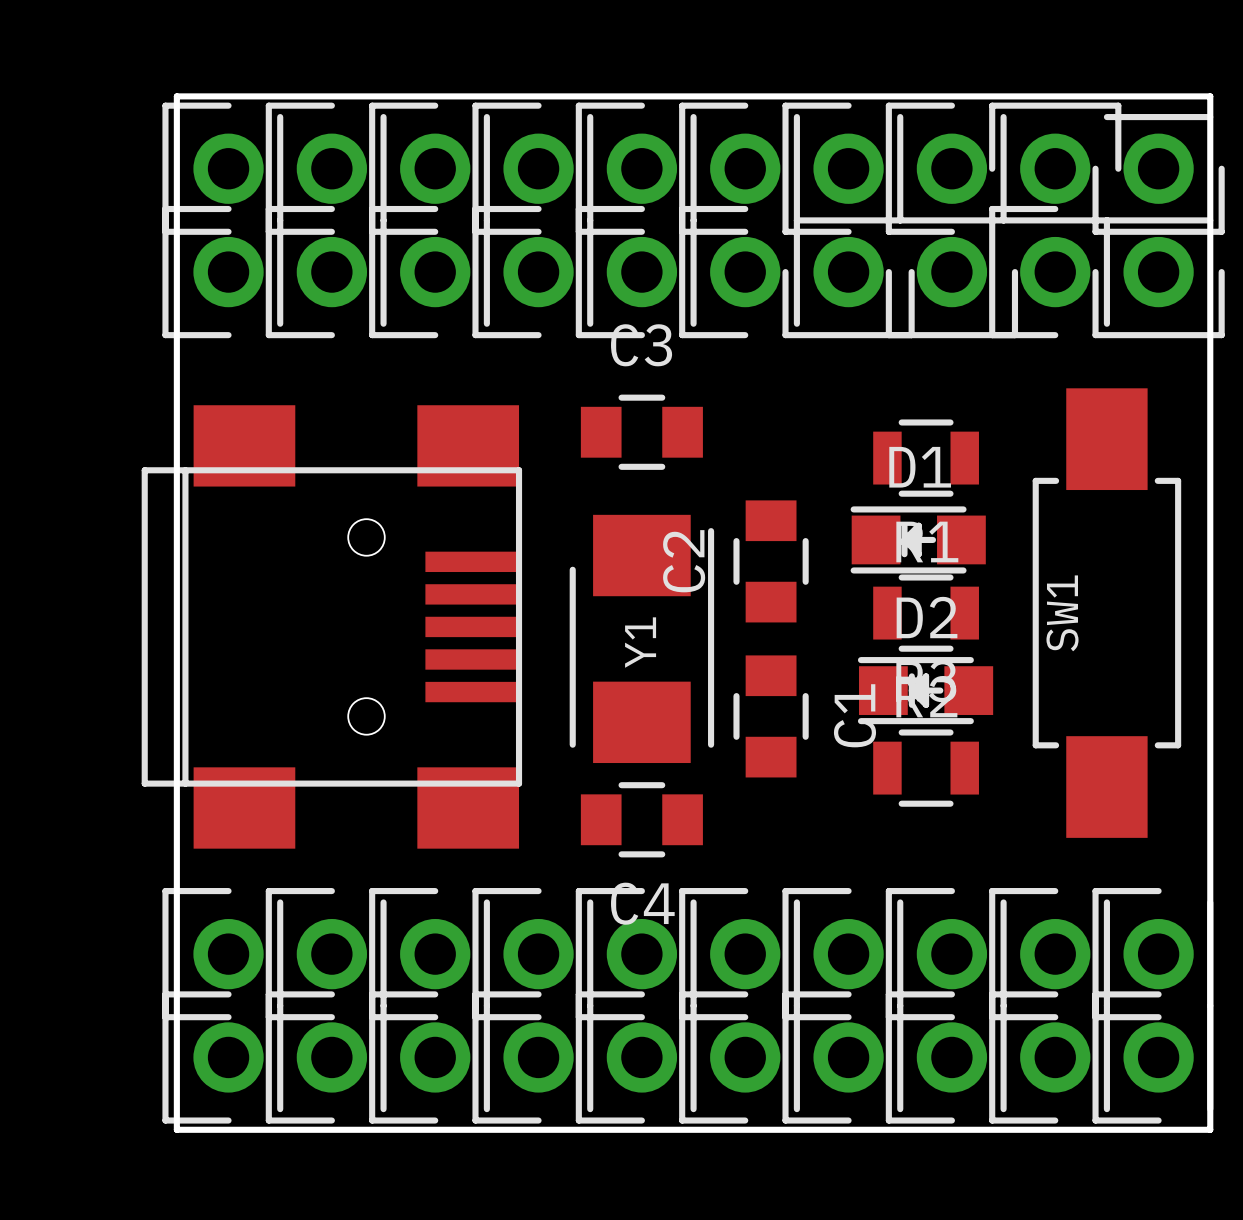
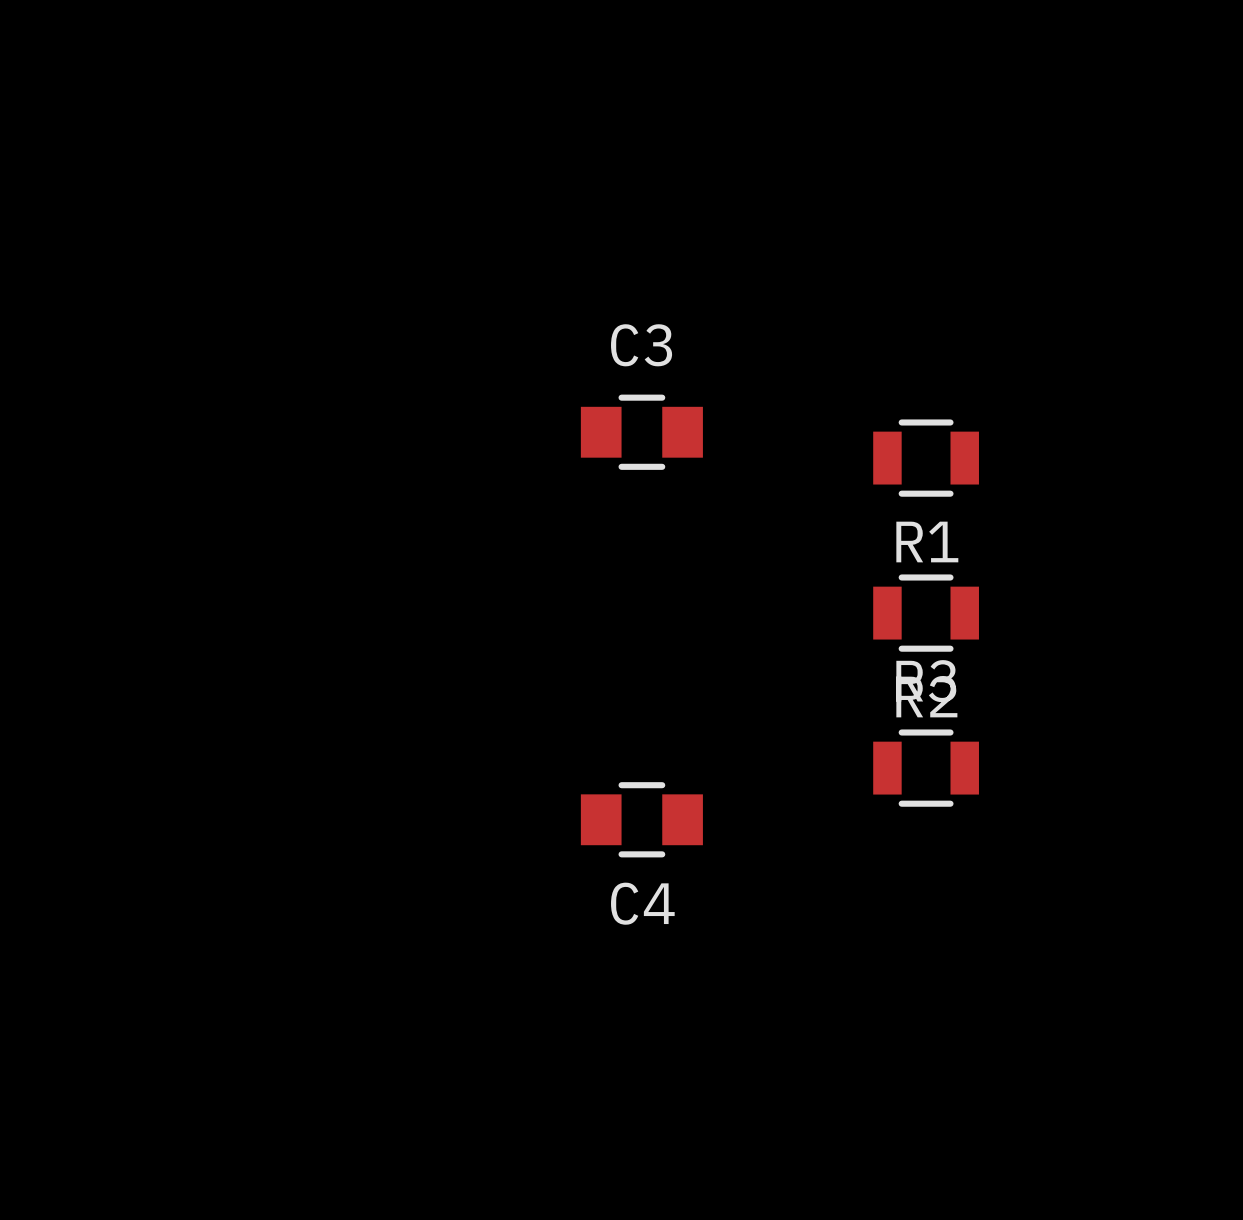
board edge: (176, 96) (176, 1129) (1210, 1129) (1210, 96) (176, 96) -> none
part: (1055, 163) -> none
part: (222, 168) -> none
part: (326, 168) -> none
part: (429, 168) -> none
part: (532, 168) -> none
part: (636, 168) -> none
part: (739, 168) -> none
part: (842, 168) -> none
part: (946, 168) -> none
part: (1158, 174) -> none
part: (222, 272) -> none
part: (326, 272) -> none
part: (429, 272) -> none
part: (532, 272) -> none
part: (636, 272) -> none
part: (739, 272) -> none
part: (1049, 272) -> none
part: (848, 277) -> none
part: (951, 277) -> none
part: (1158, 277) -> none
D1: (918, 539) -> none
C2: (771, 561) -> none
SW1: (1106, 613) -> none
part: (331, 626) -> none
Y1: (641, 638) -> none
D2: (925, 690) -> none
C1: (771, 716) -> none
part: (222, 954) -> none
part: (326, 954) -> none
part: (429, 954) -> none
part: (532, 954) -> none
part: (636, 954) -> none
part: (739, 954) -> none
part: (842, 954) -> none
part: (946, 954) -> none
part: (1049, 954) -> none
part: (1152, 954) -> none
part: (222, 1057) -> none
part: (326, 1057) -> none
part: (429, 1057) -> none
part: (532, 1057) -> none
part: (636, 1057) -> none
part: (739, 1057) -> none
part: (842, 1057) -> none
part: (946, 1057) -> none
part: (1049, 1057) -> none
part: (1152, 1057) -> none

